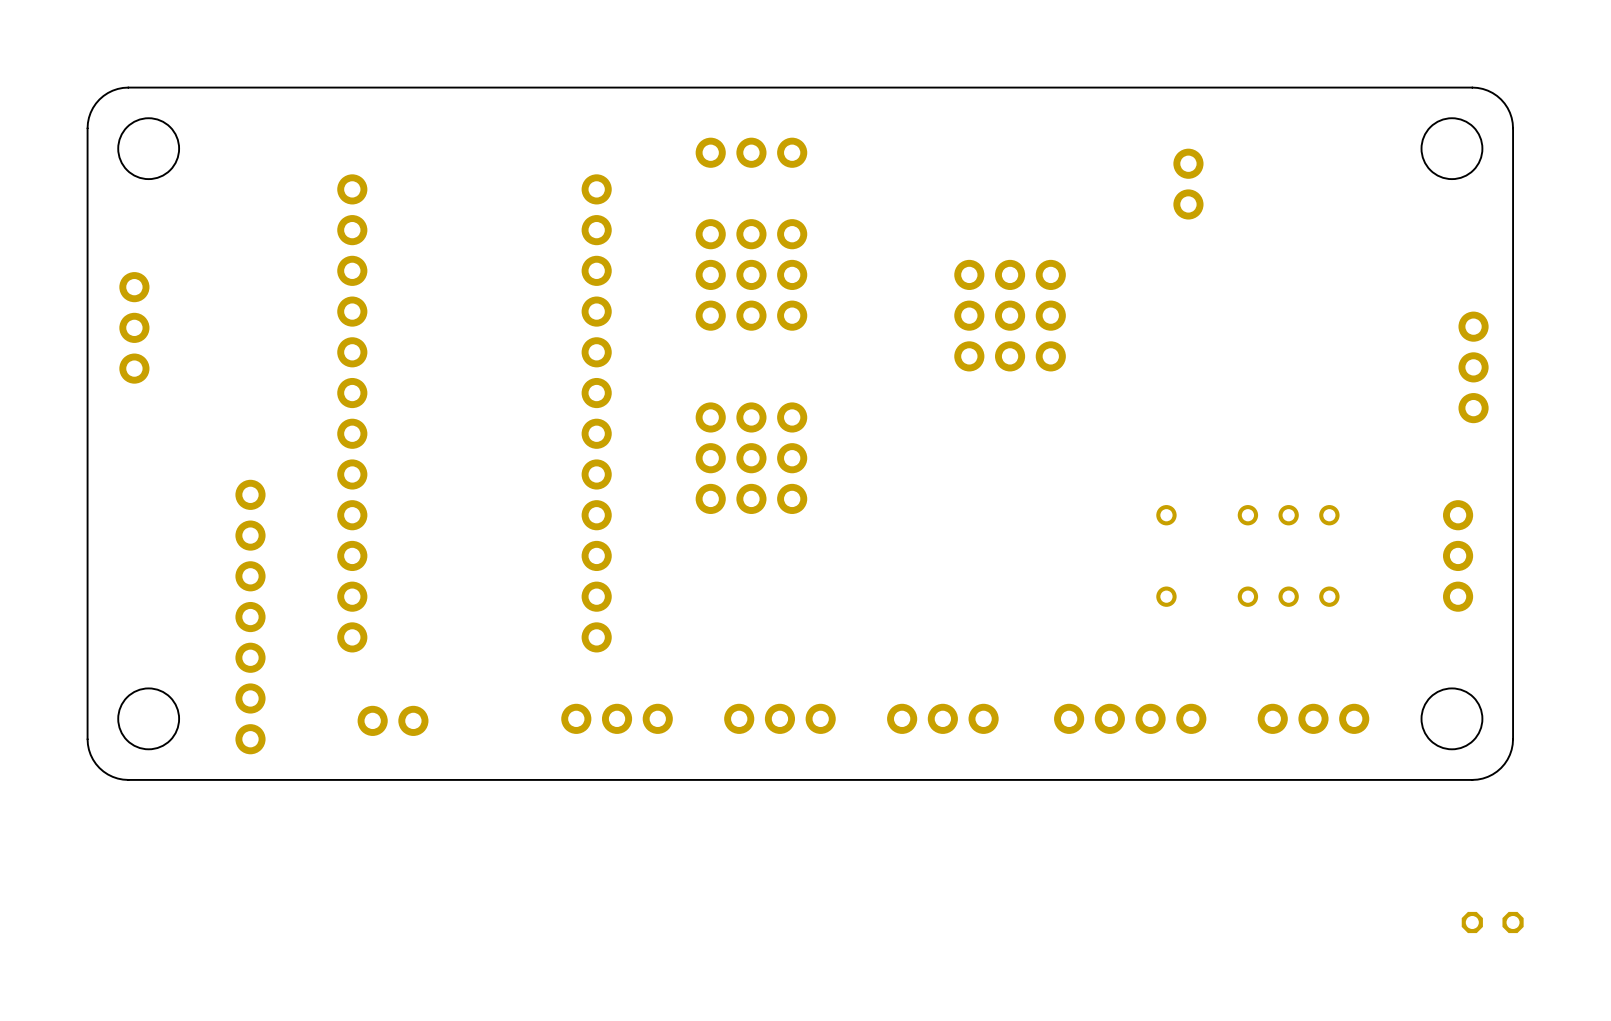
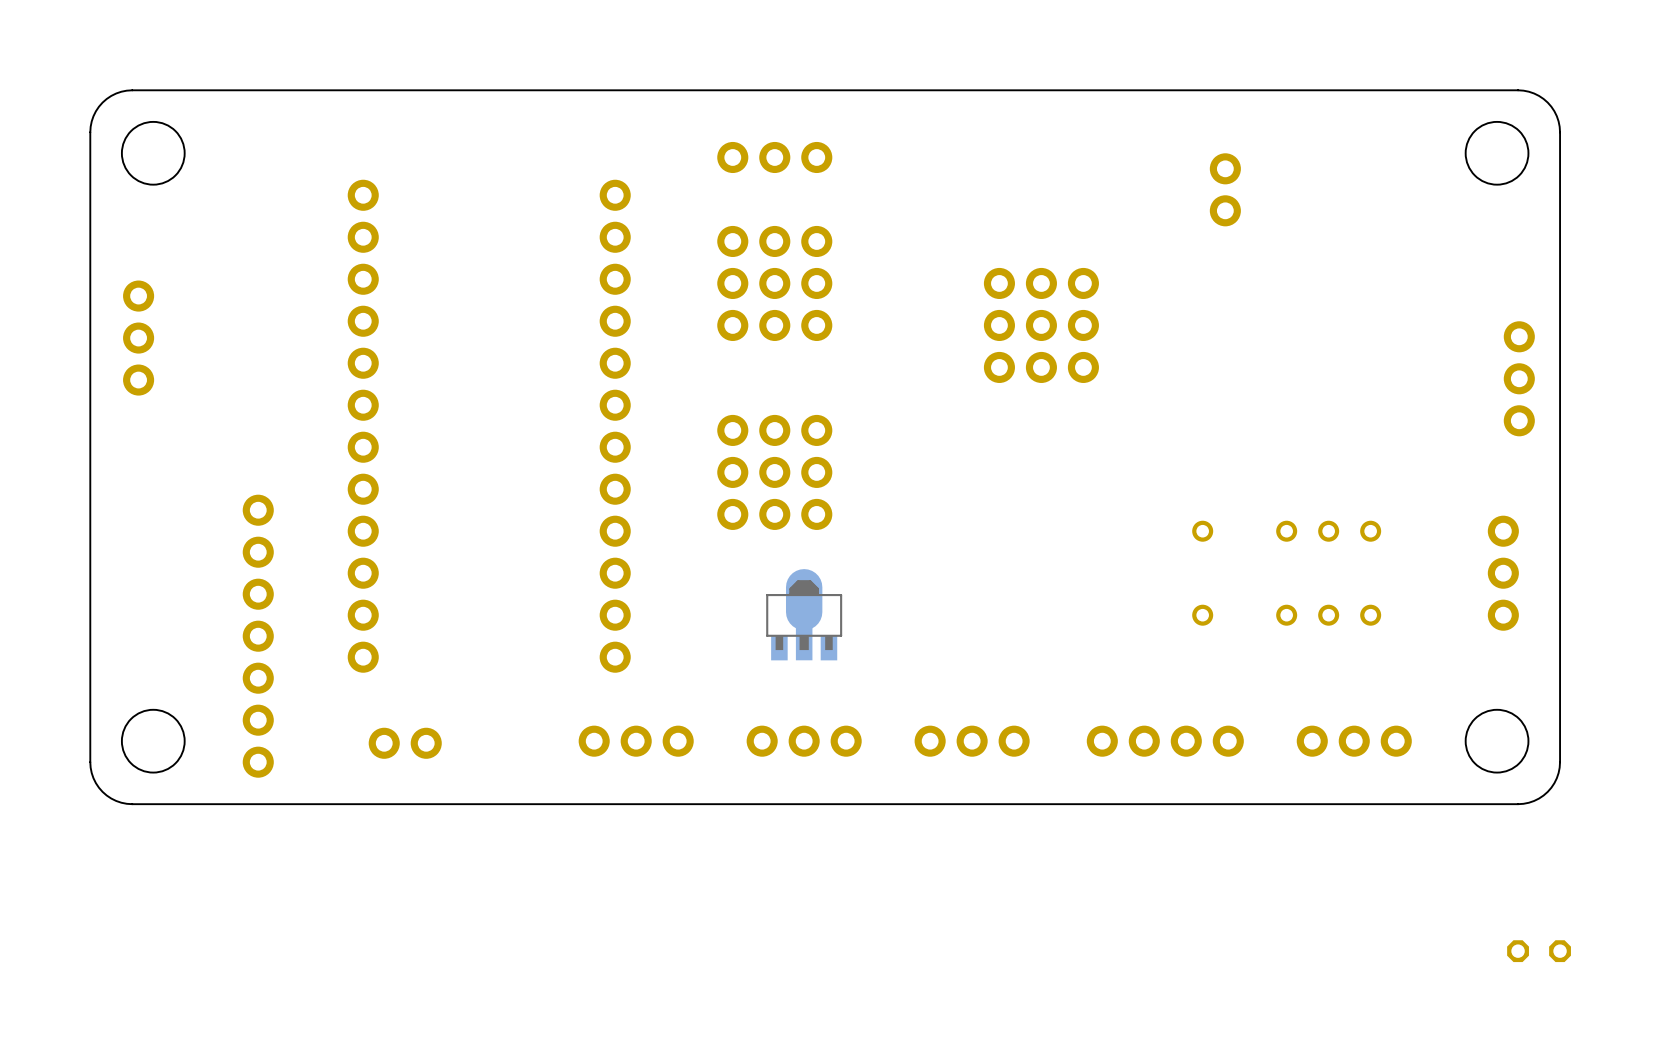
part: none -> (804, 614)

